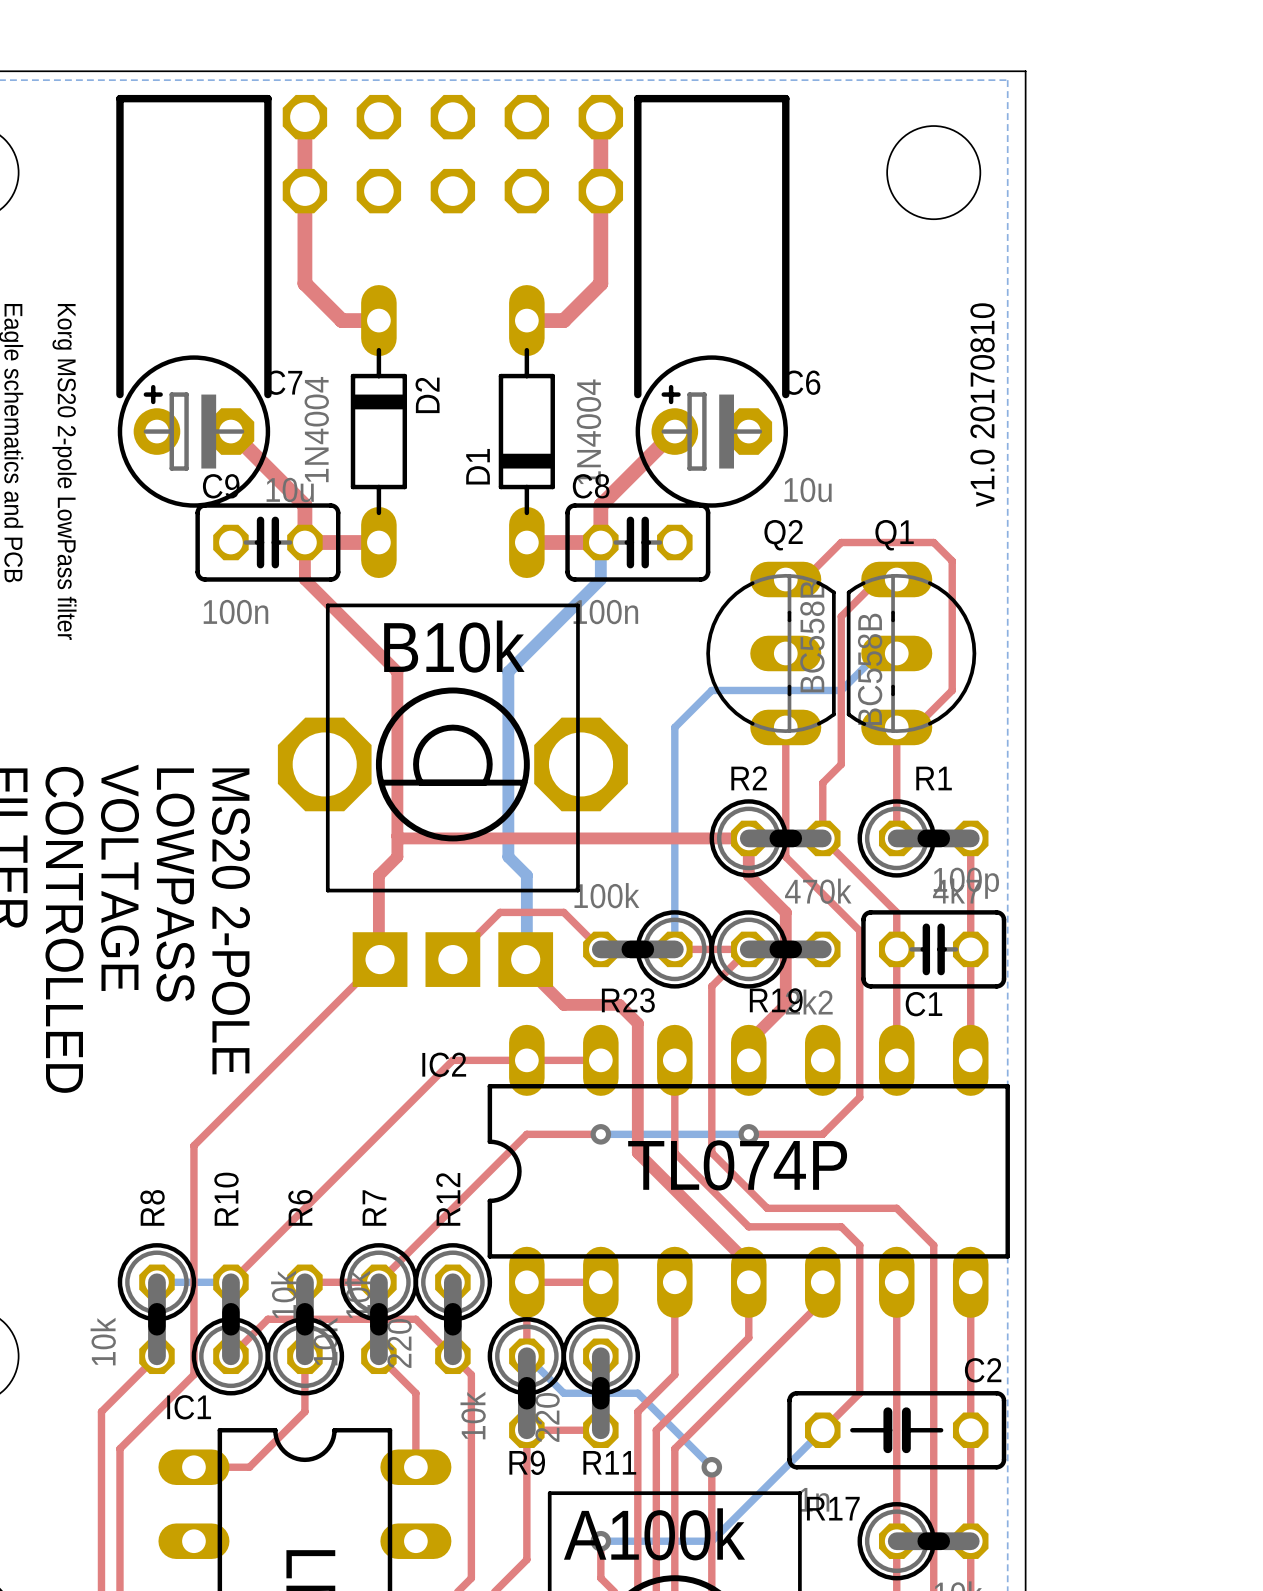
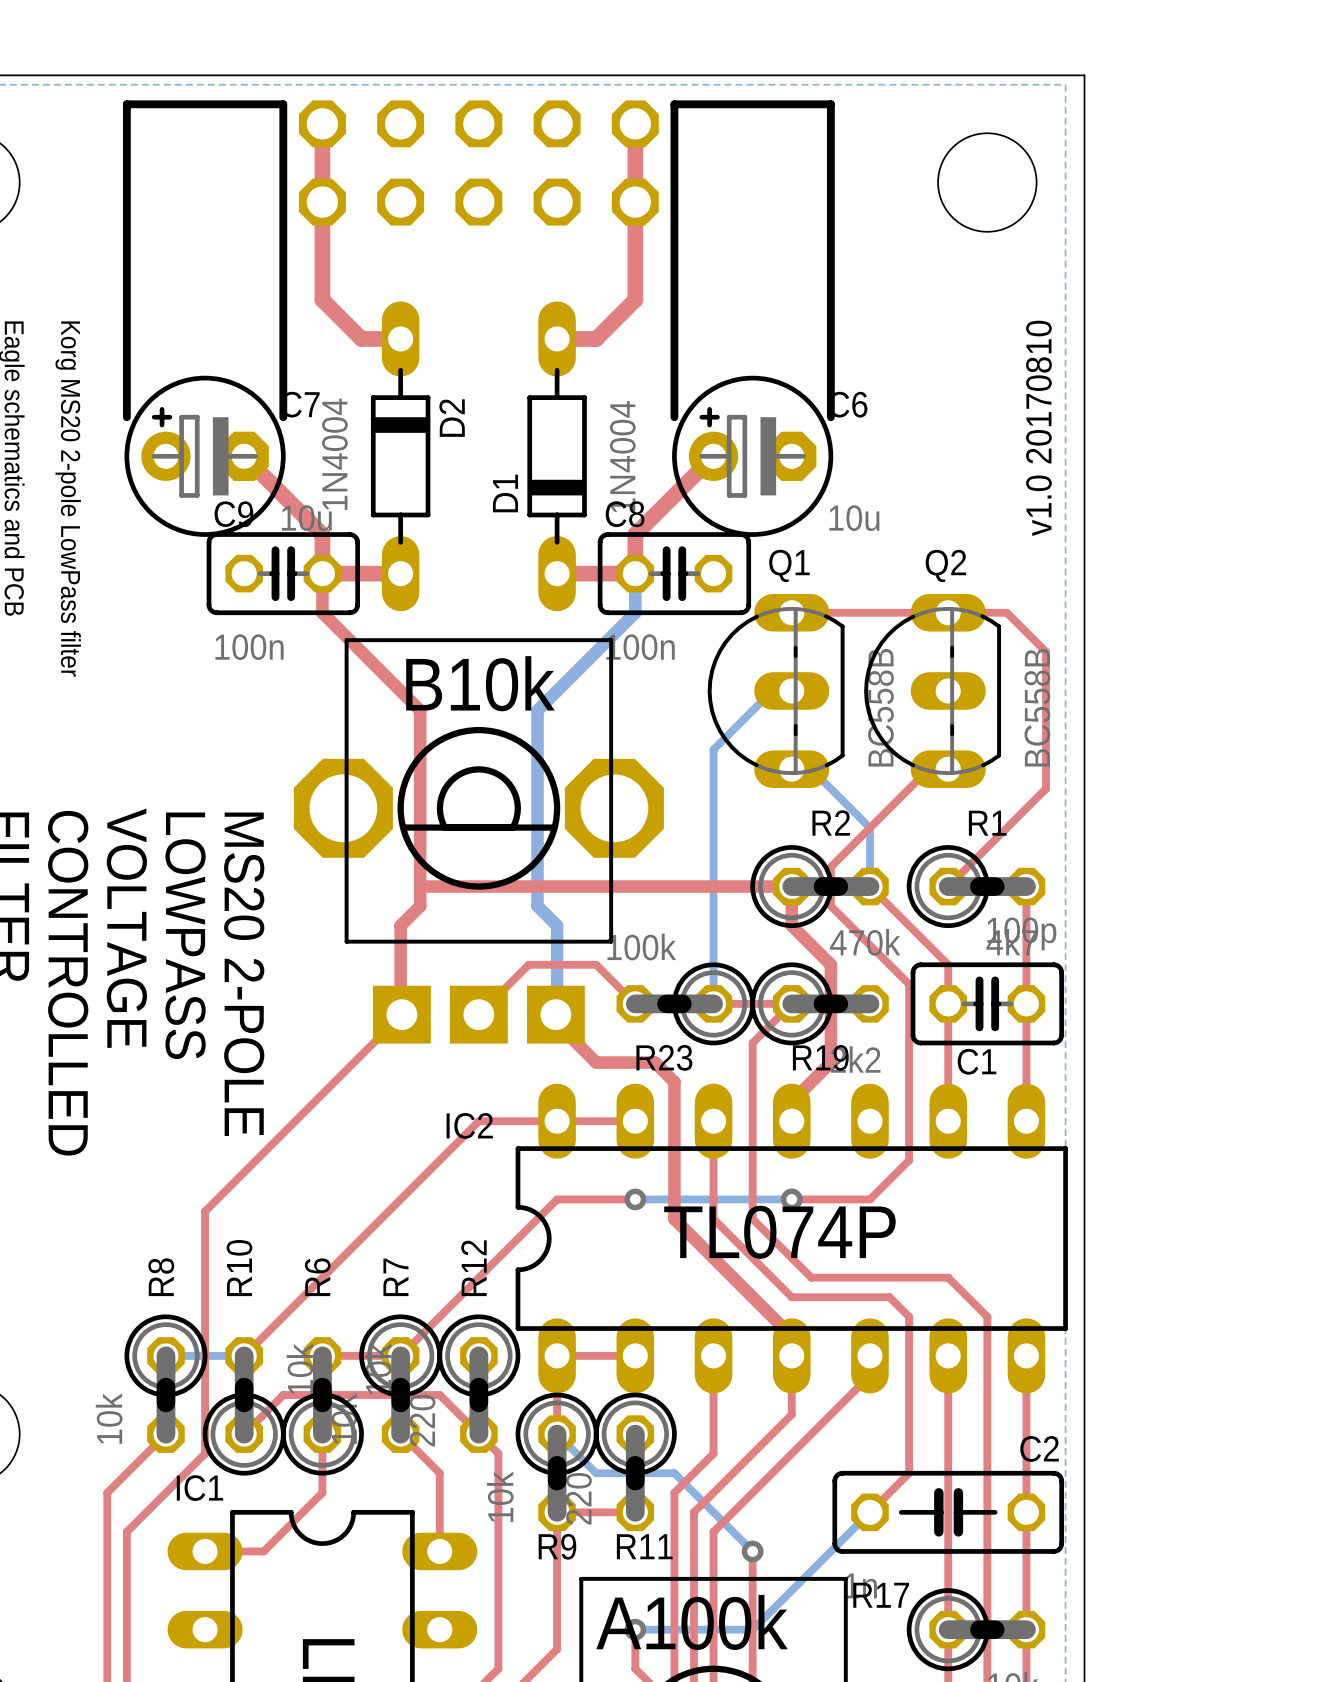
top track: (804, 579) (841, 542) (933, 542) (952, 561) (952, 690) (915, 727) (896, 727) (896, 838) -> (948, 612) (1006, 612) (1046, 651) (1046, 788) (948, 886)
top track: none -> (850, 612) (928, 612)
top track: (878, 579) (841, 616) (841, 764) -> (948, 769) (928, 769) (889, 808)
Q2 position: (770, 653) -> (932, 690)
bottom track: (896, 653) (878, 653) (841, 690) (711, 690) (674, 727) -> (791, 690) (772, 690) (713, 749) (713, 769)
Q1 rotation: 0° (911, 653) -> 180° (776, 690)
Q1 position: (911, 653) -> (776, 690)
bottom track: none -> (791, 769) (811, 769) (869, 827) (869, 886)
top track: (785, 727) (785, 819) -> none
R2 name position: R2 (749, 778) -> R2 (831, 823)
top track: (822, 782) (822, 838) -> (869, 827) (830, 866)

